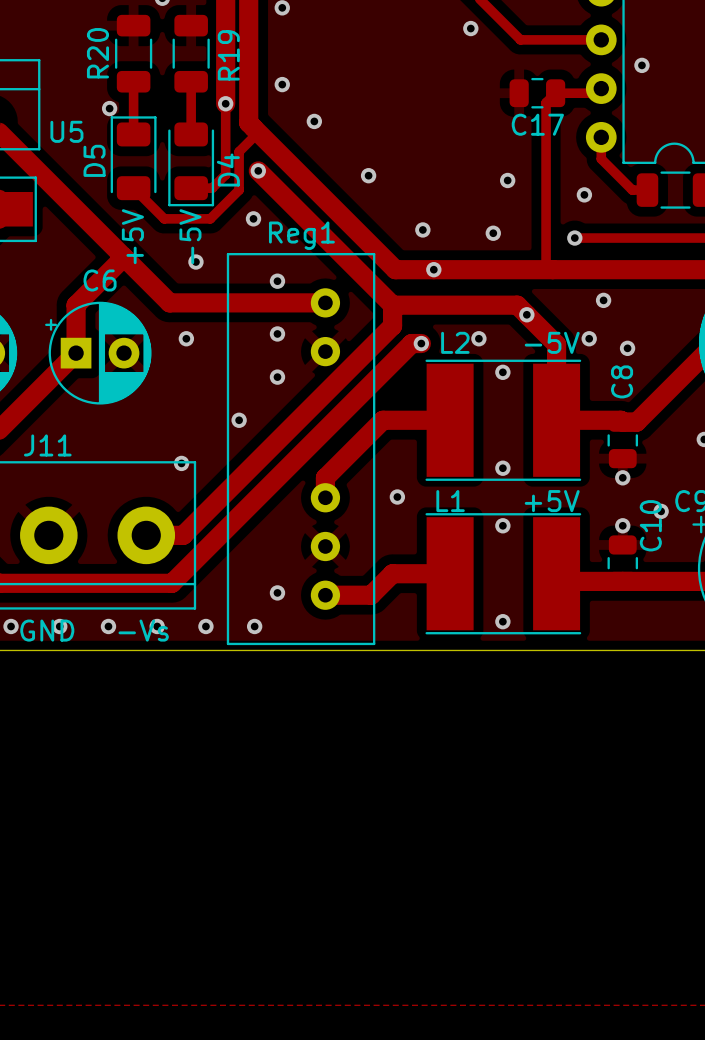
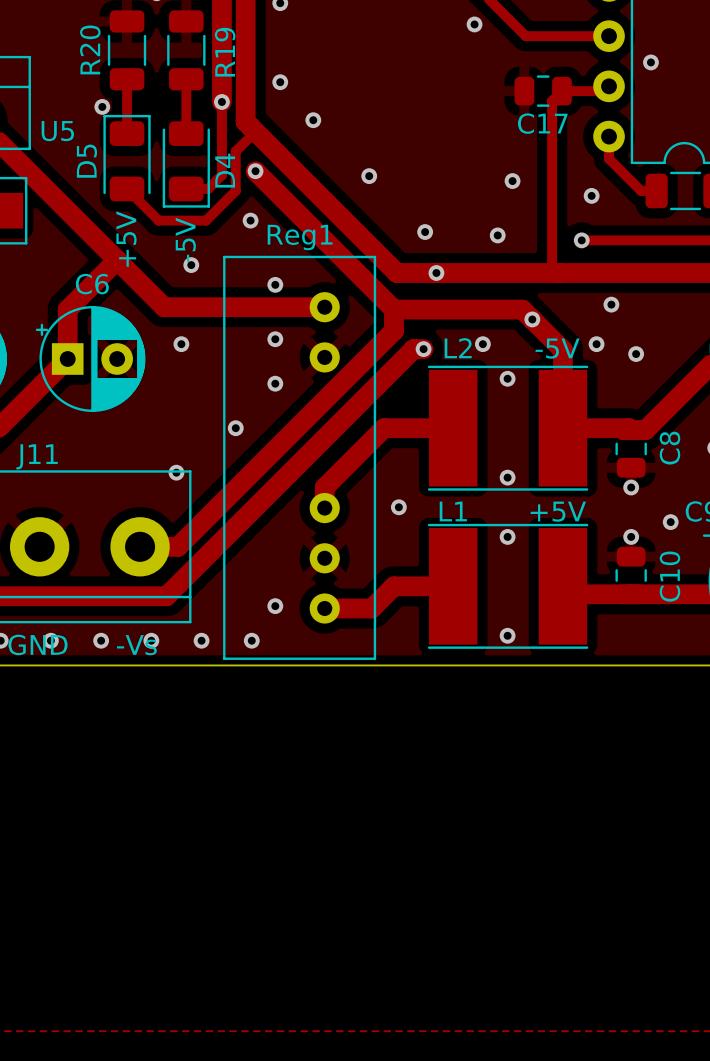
C8 name position: C8 (622, 381) -> C8 (669, 448)
C10 name position: C10 (650, 525) -> C10 (669, 576)

